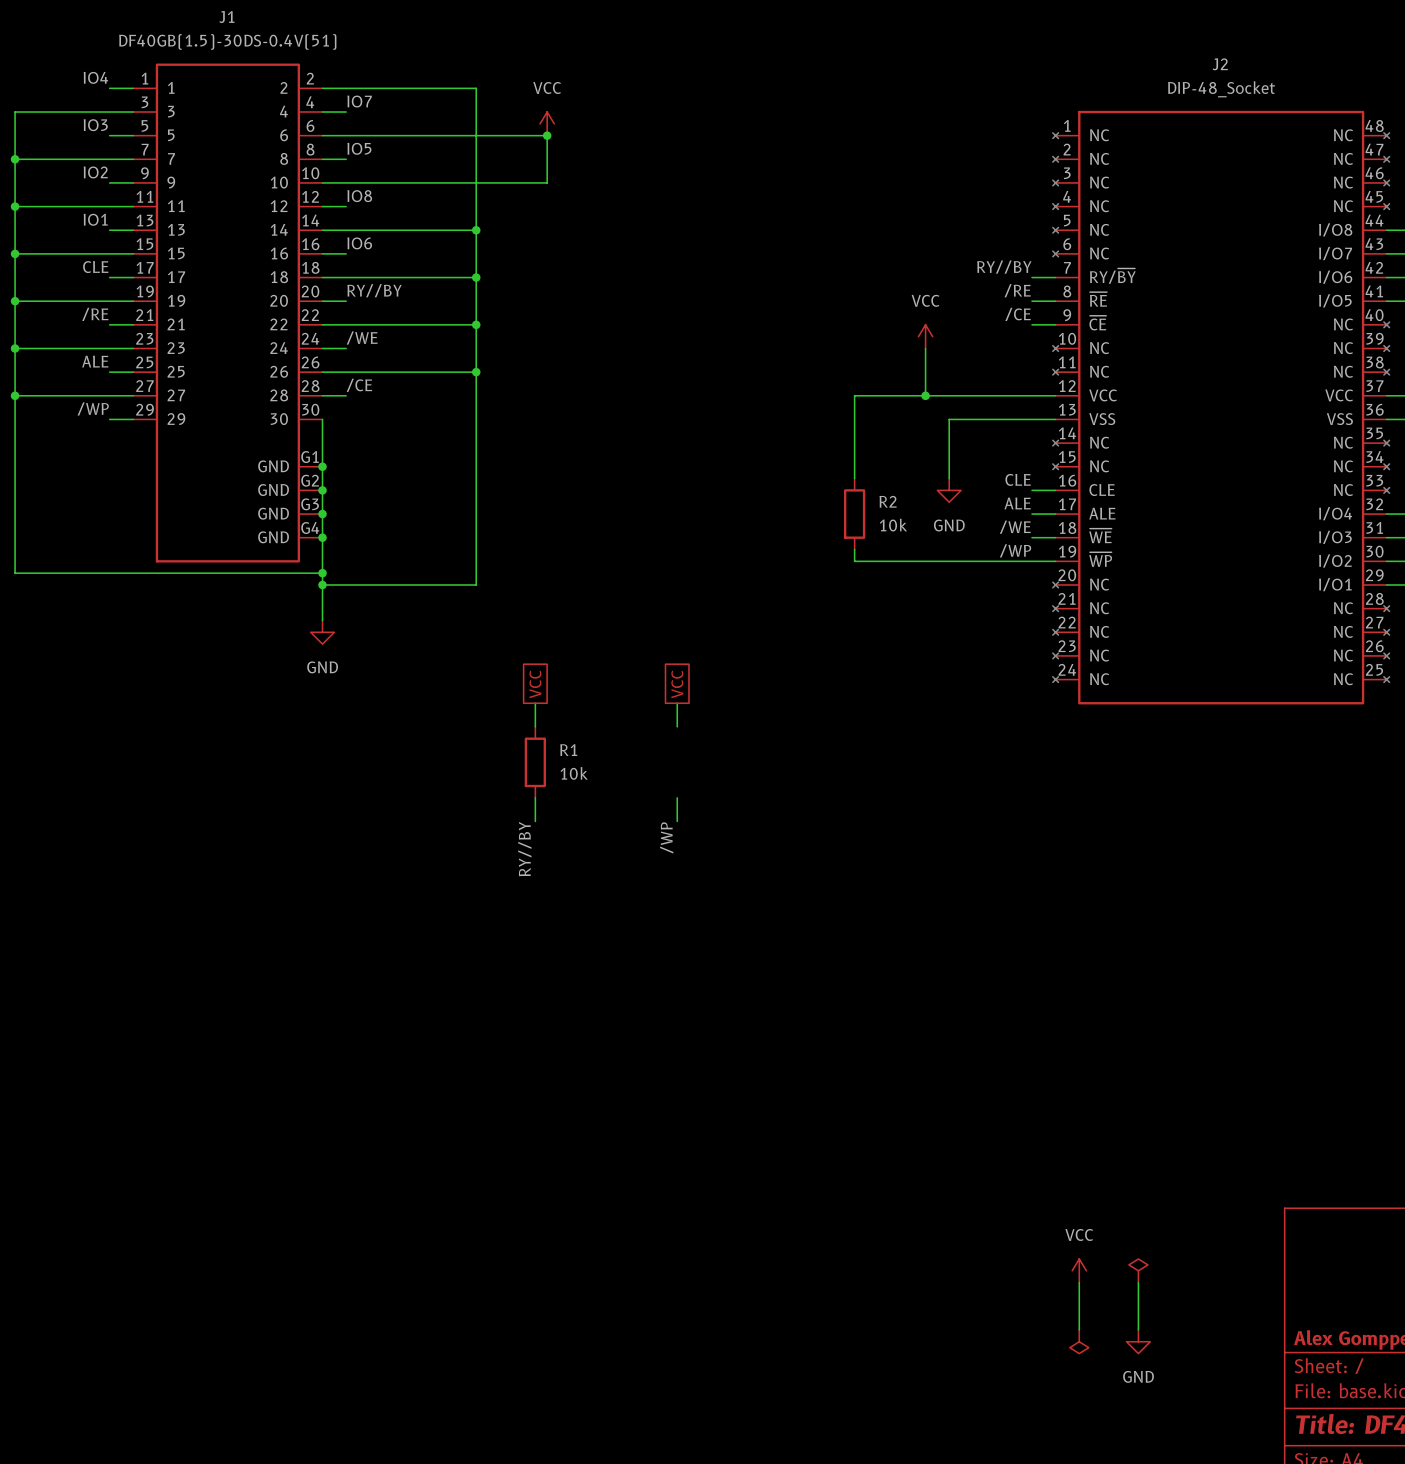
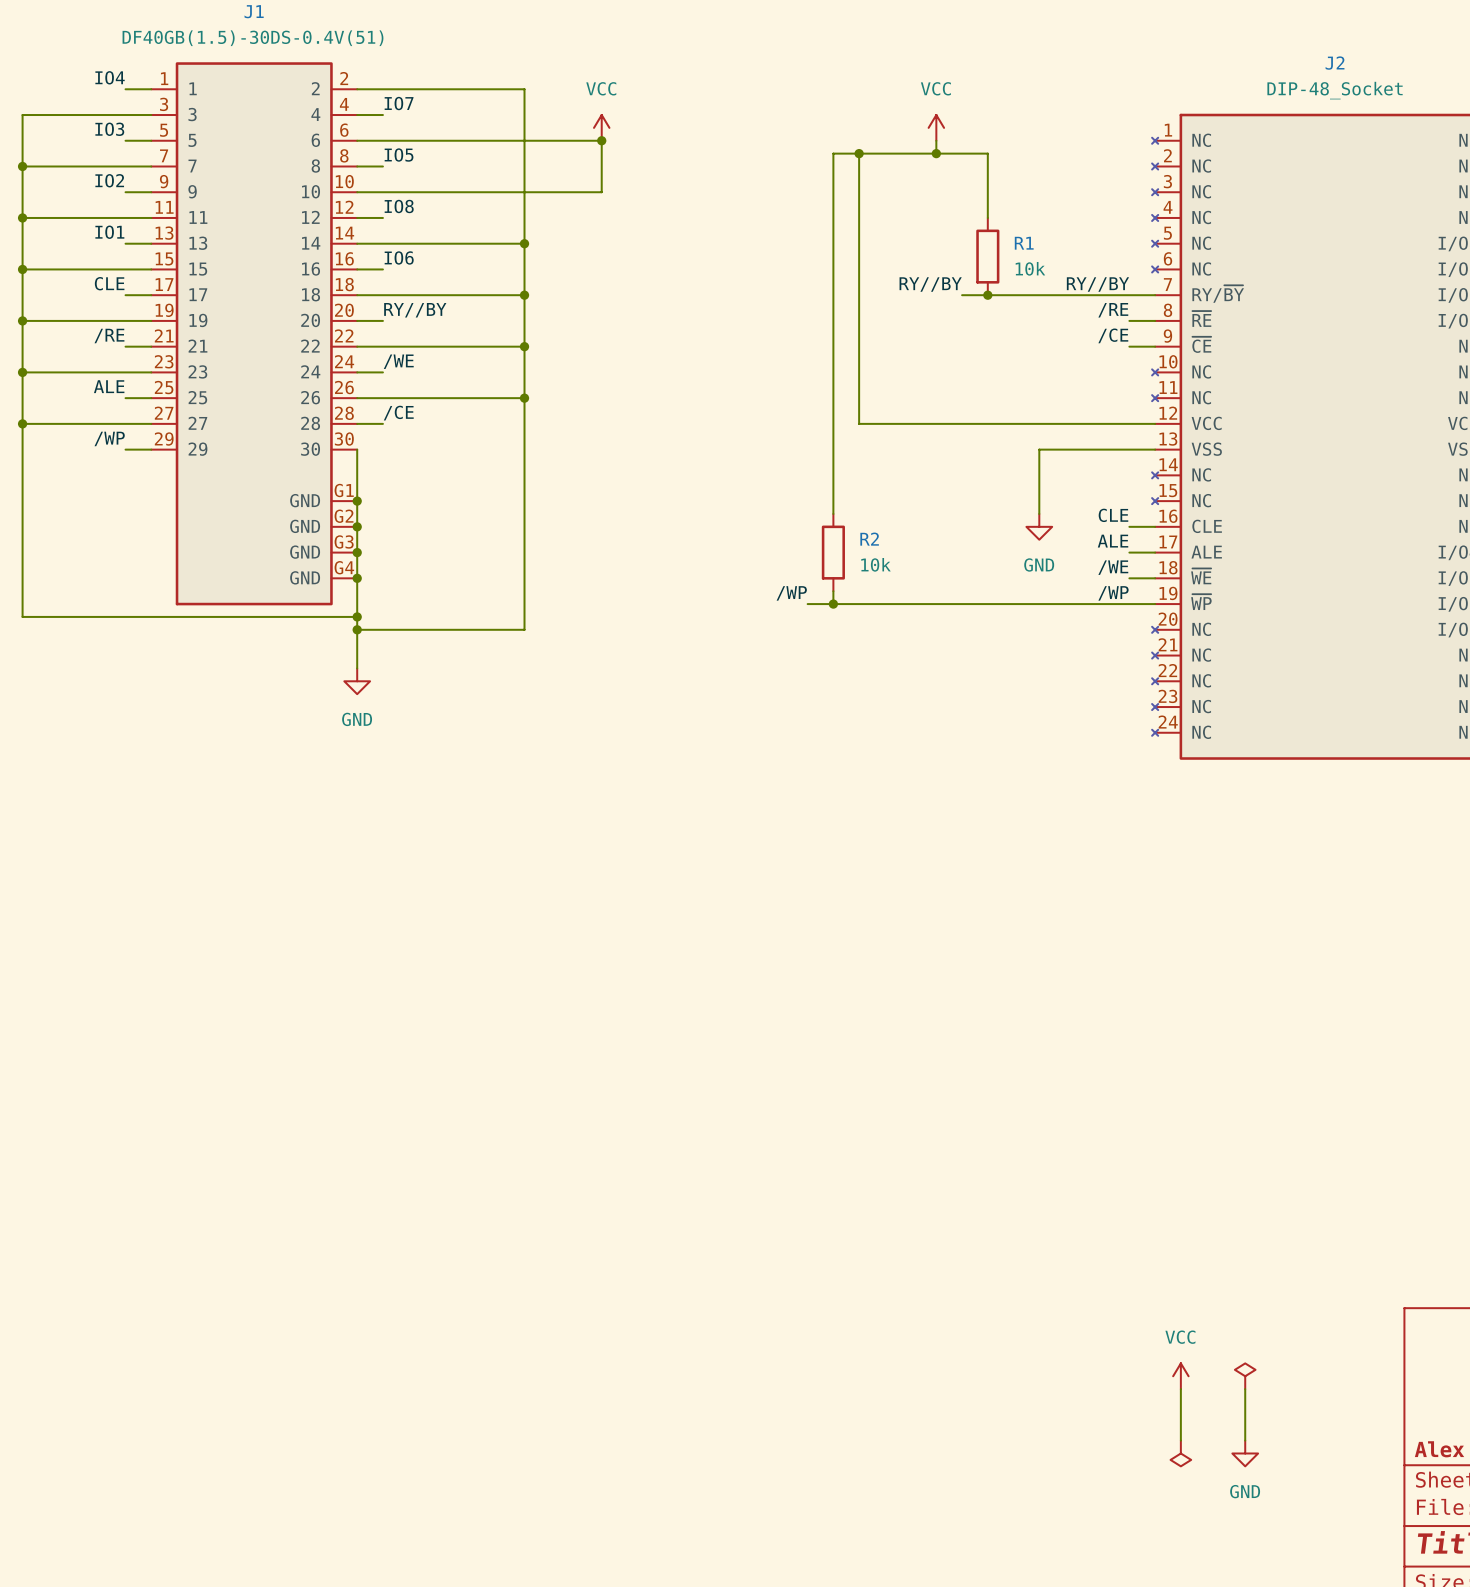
wire: none -> (936, 140) (936, 153)
junction: none -> (859, 153)
junction: none -> (936, 153)
wire: none -> (987, 217) (987, 153) (833, 153) (833, 513)
label: none -> RY//BY (930, 284)
wire: none -> (962, 295) (1129, 295)
junction: none -> (987, 295)
power symbol position: VCC (925, 336) -> VCC (936, 127)
wire: (925, 348) (925, 395) -> none
wire: (854, 395) (854, 478) -> (936, 423) (859, 423) (859, 153)
junction: (925, 395) -> none
R2 position: (854, 514) -> (833, 552)
wire: none -> (833, 591) (833, 604)
wire: (854, 549) (854, 561) -> (807, 604) (936, 604)
label: none -> /WP (791, 593)
junction: none -> (833, 604)
global label: VCC (535, 684) -> none
global label: VCC (677, 684) -> none
wire: (535, 703) (535, 726) -> none
wire: (677, 703) (677, 726) -> none
R1 position: (535, 762) -> (987, 256)
wire: (535, 797) (535, 821) -> none
wire: (677, 797) (677, 821) -> none
label: /WP (666, 837) -> none
label: RY//BY (524, 849) -> none

